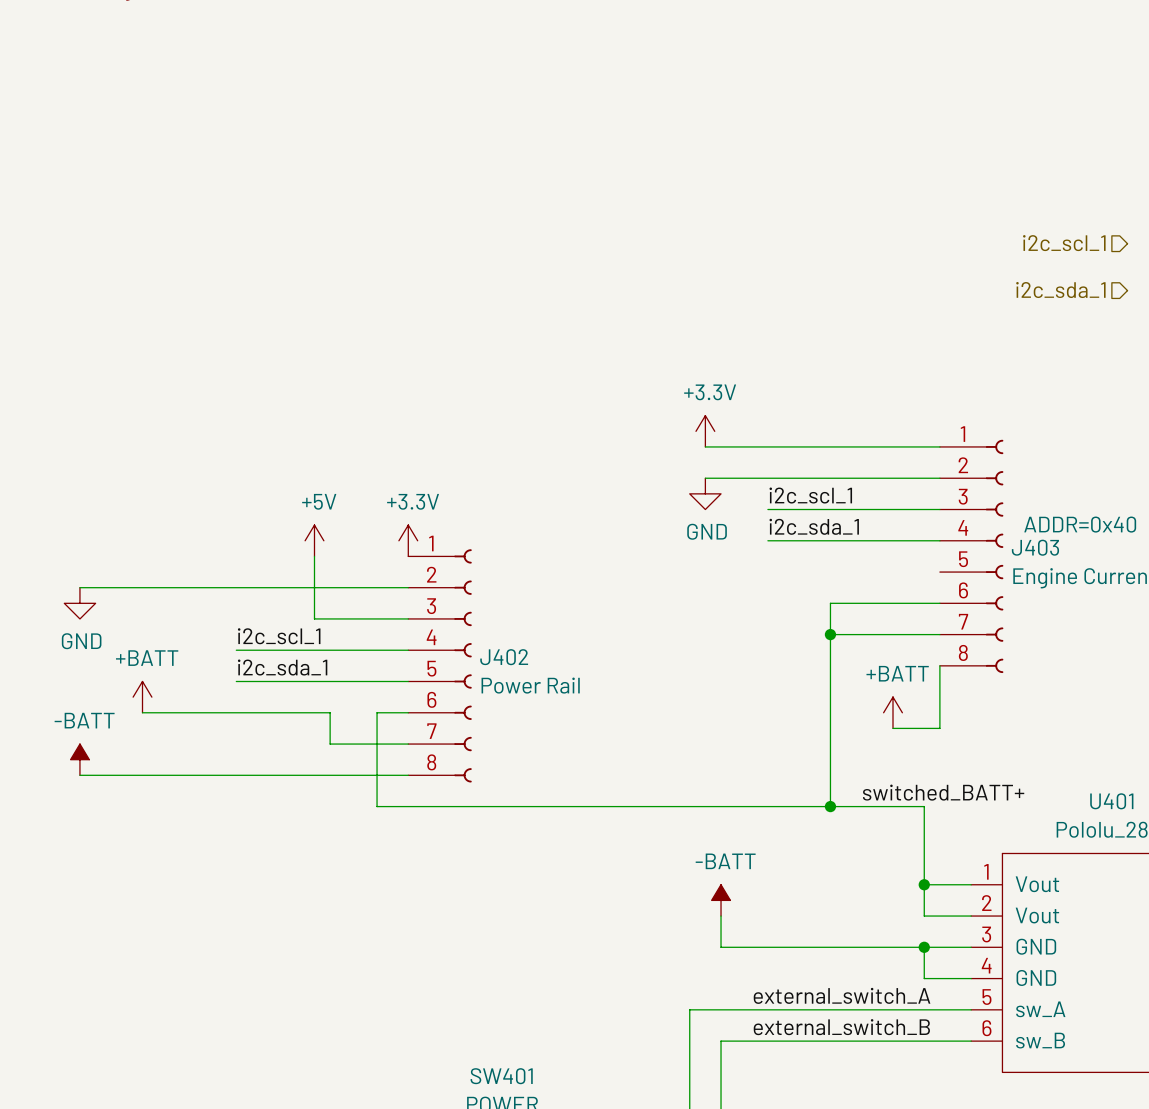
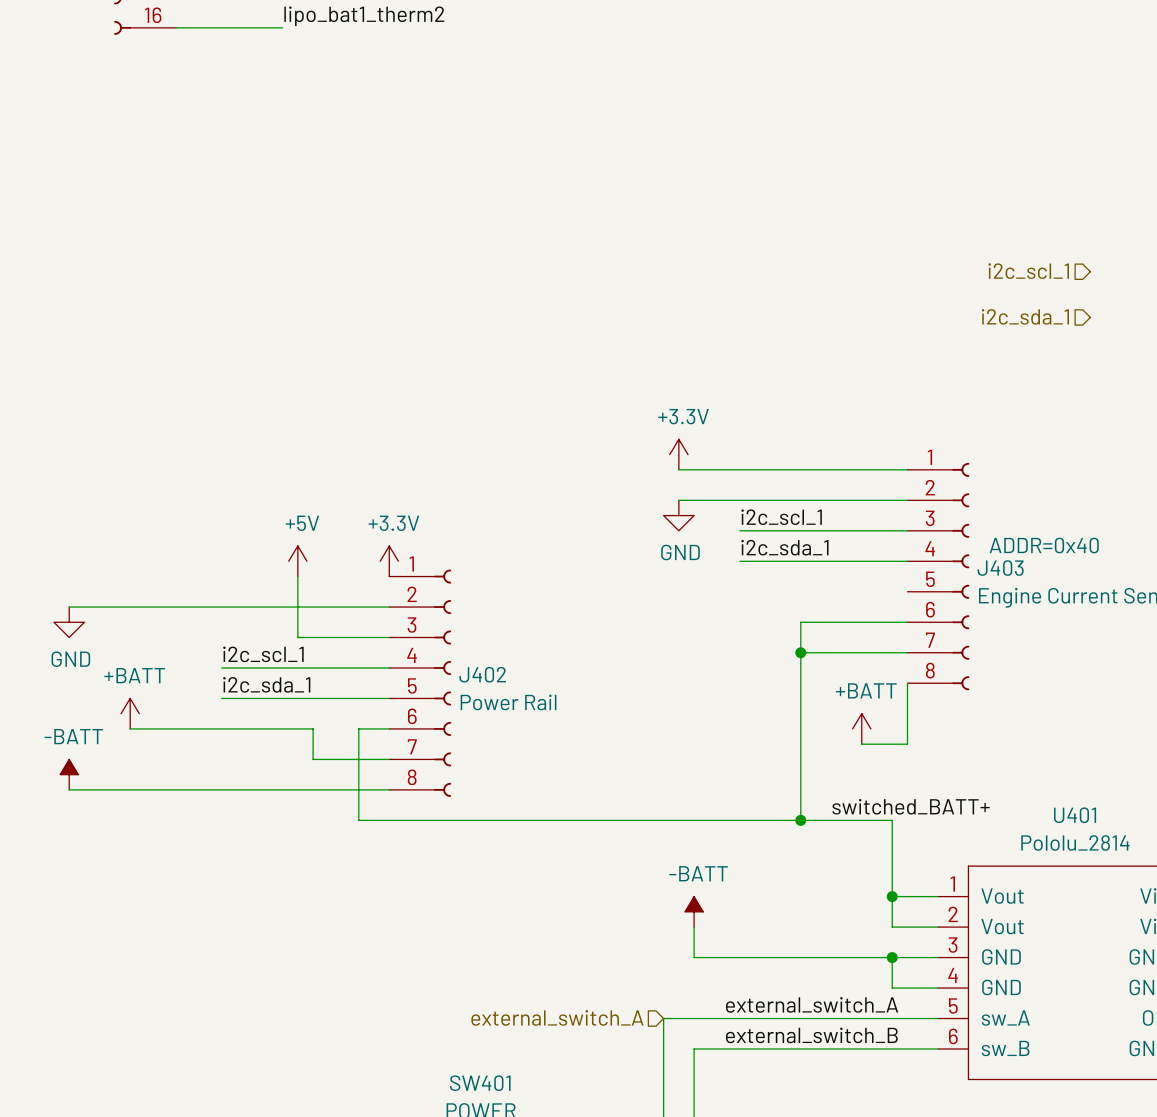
hierarchical label: none -> external_switch_A (557, 1017)

